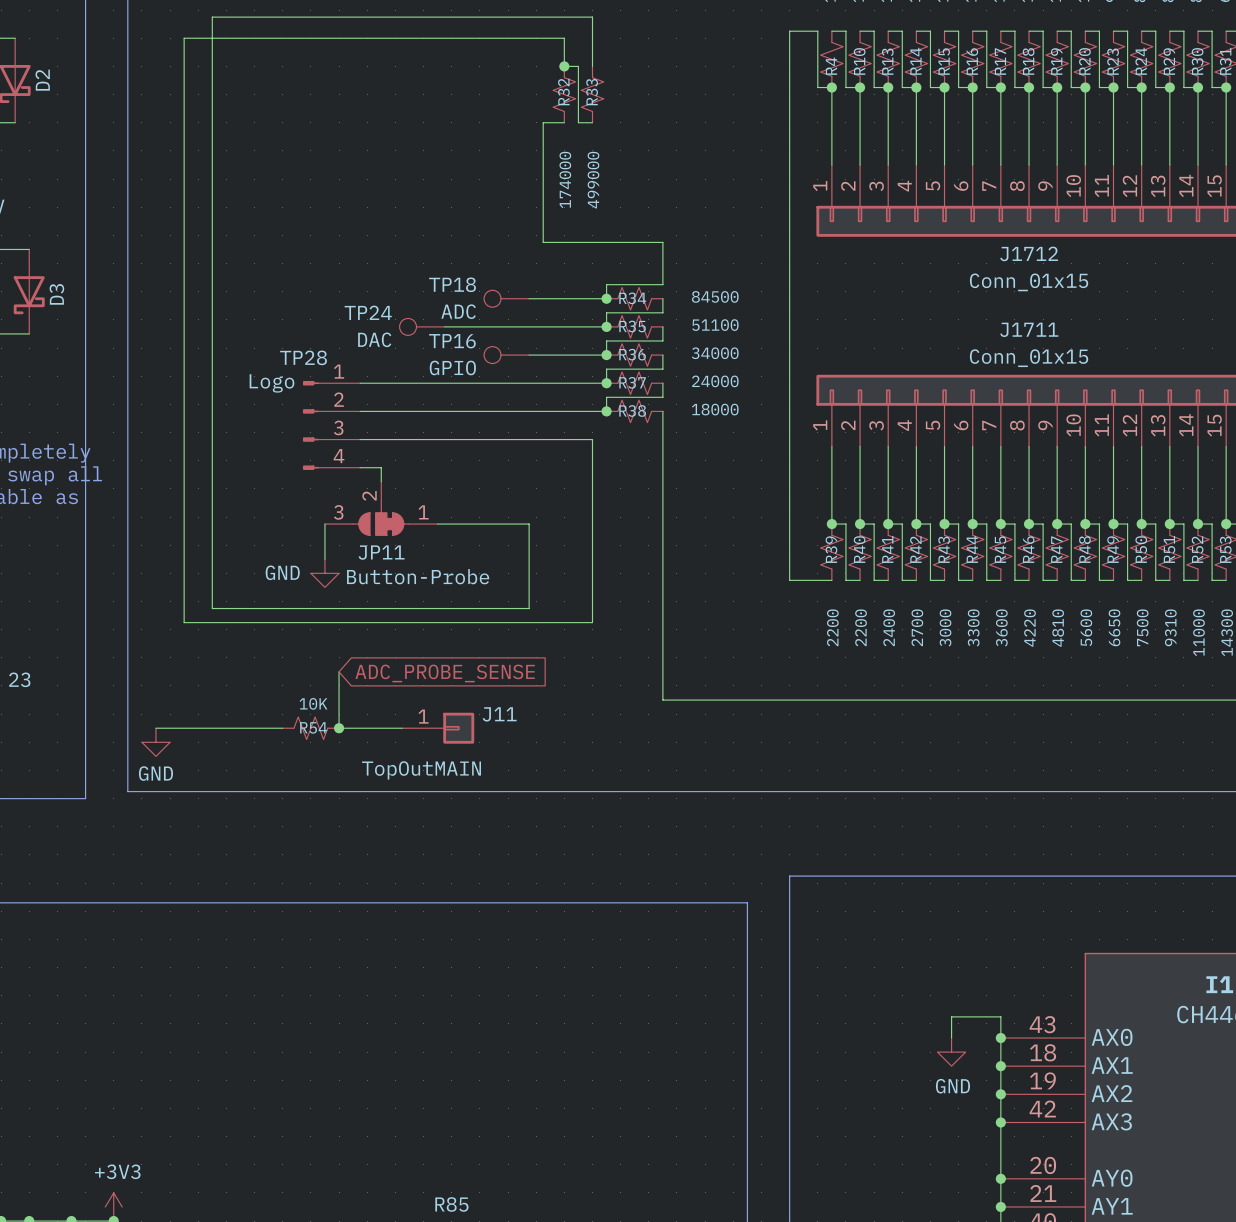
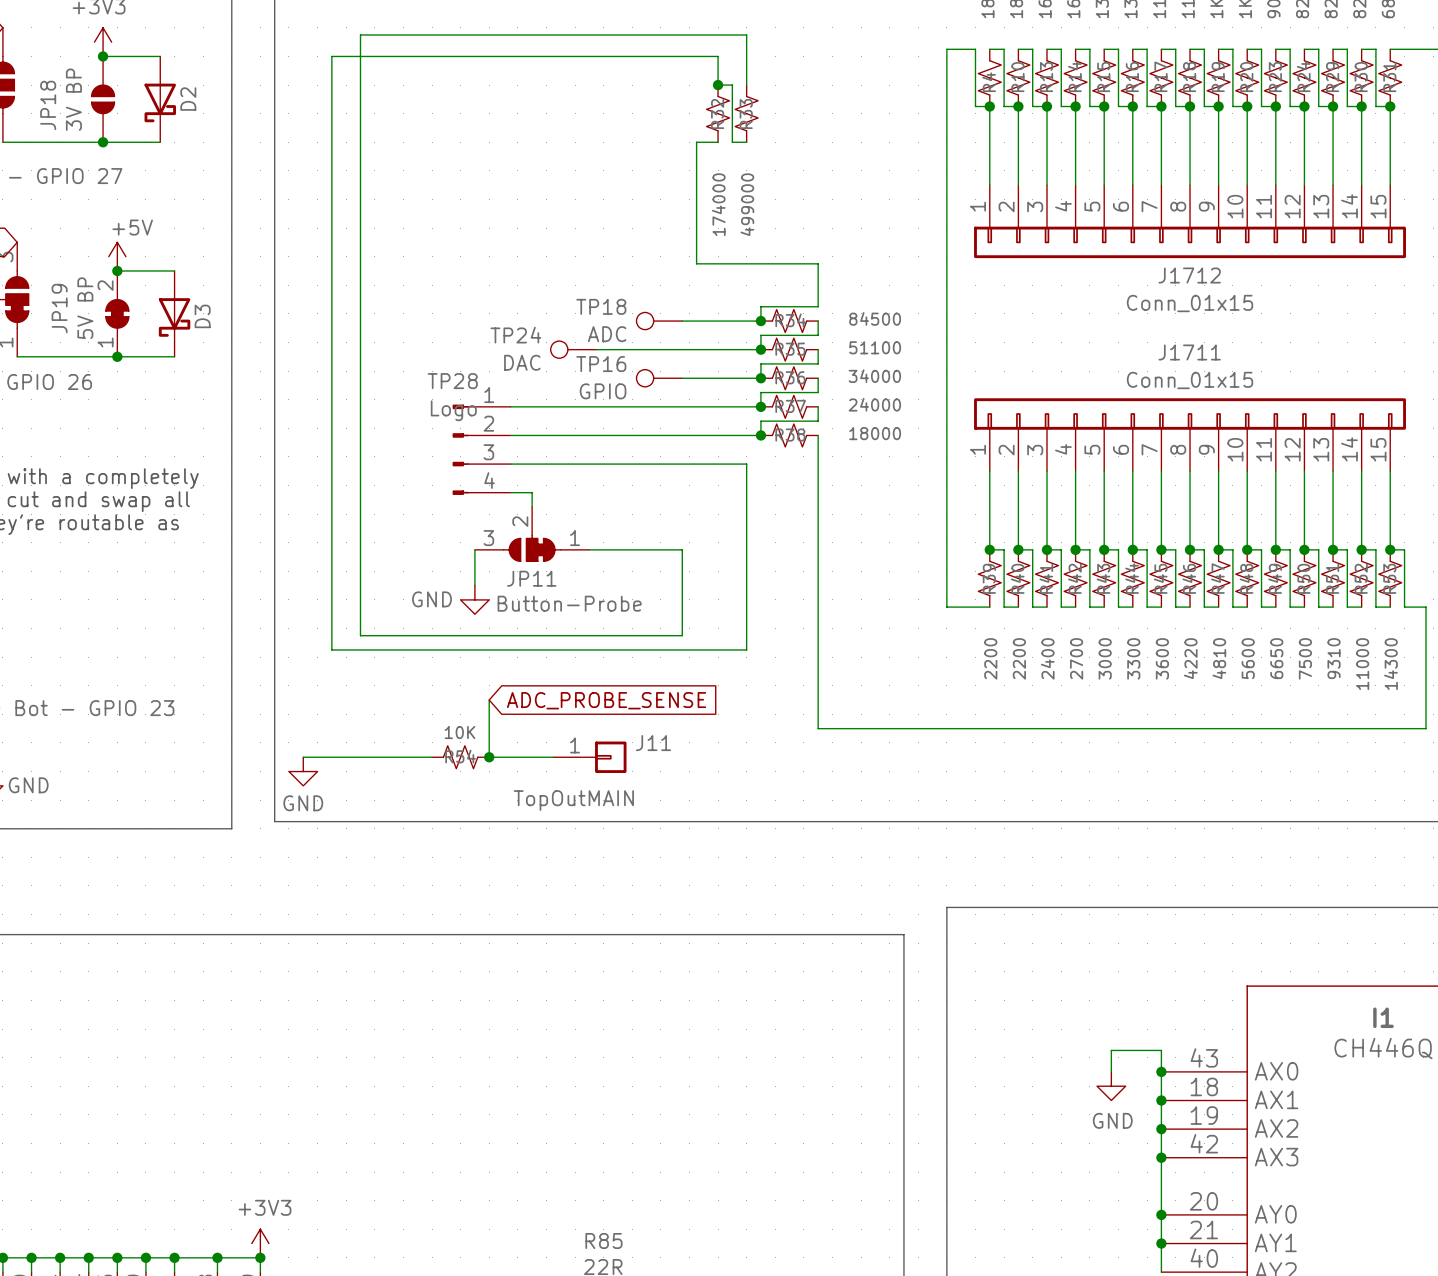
TP28 value position: Logo (271, 383) -> Logo (453, 410)

